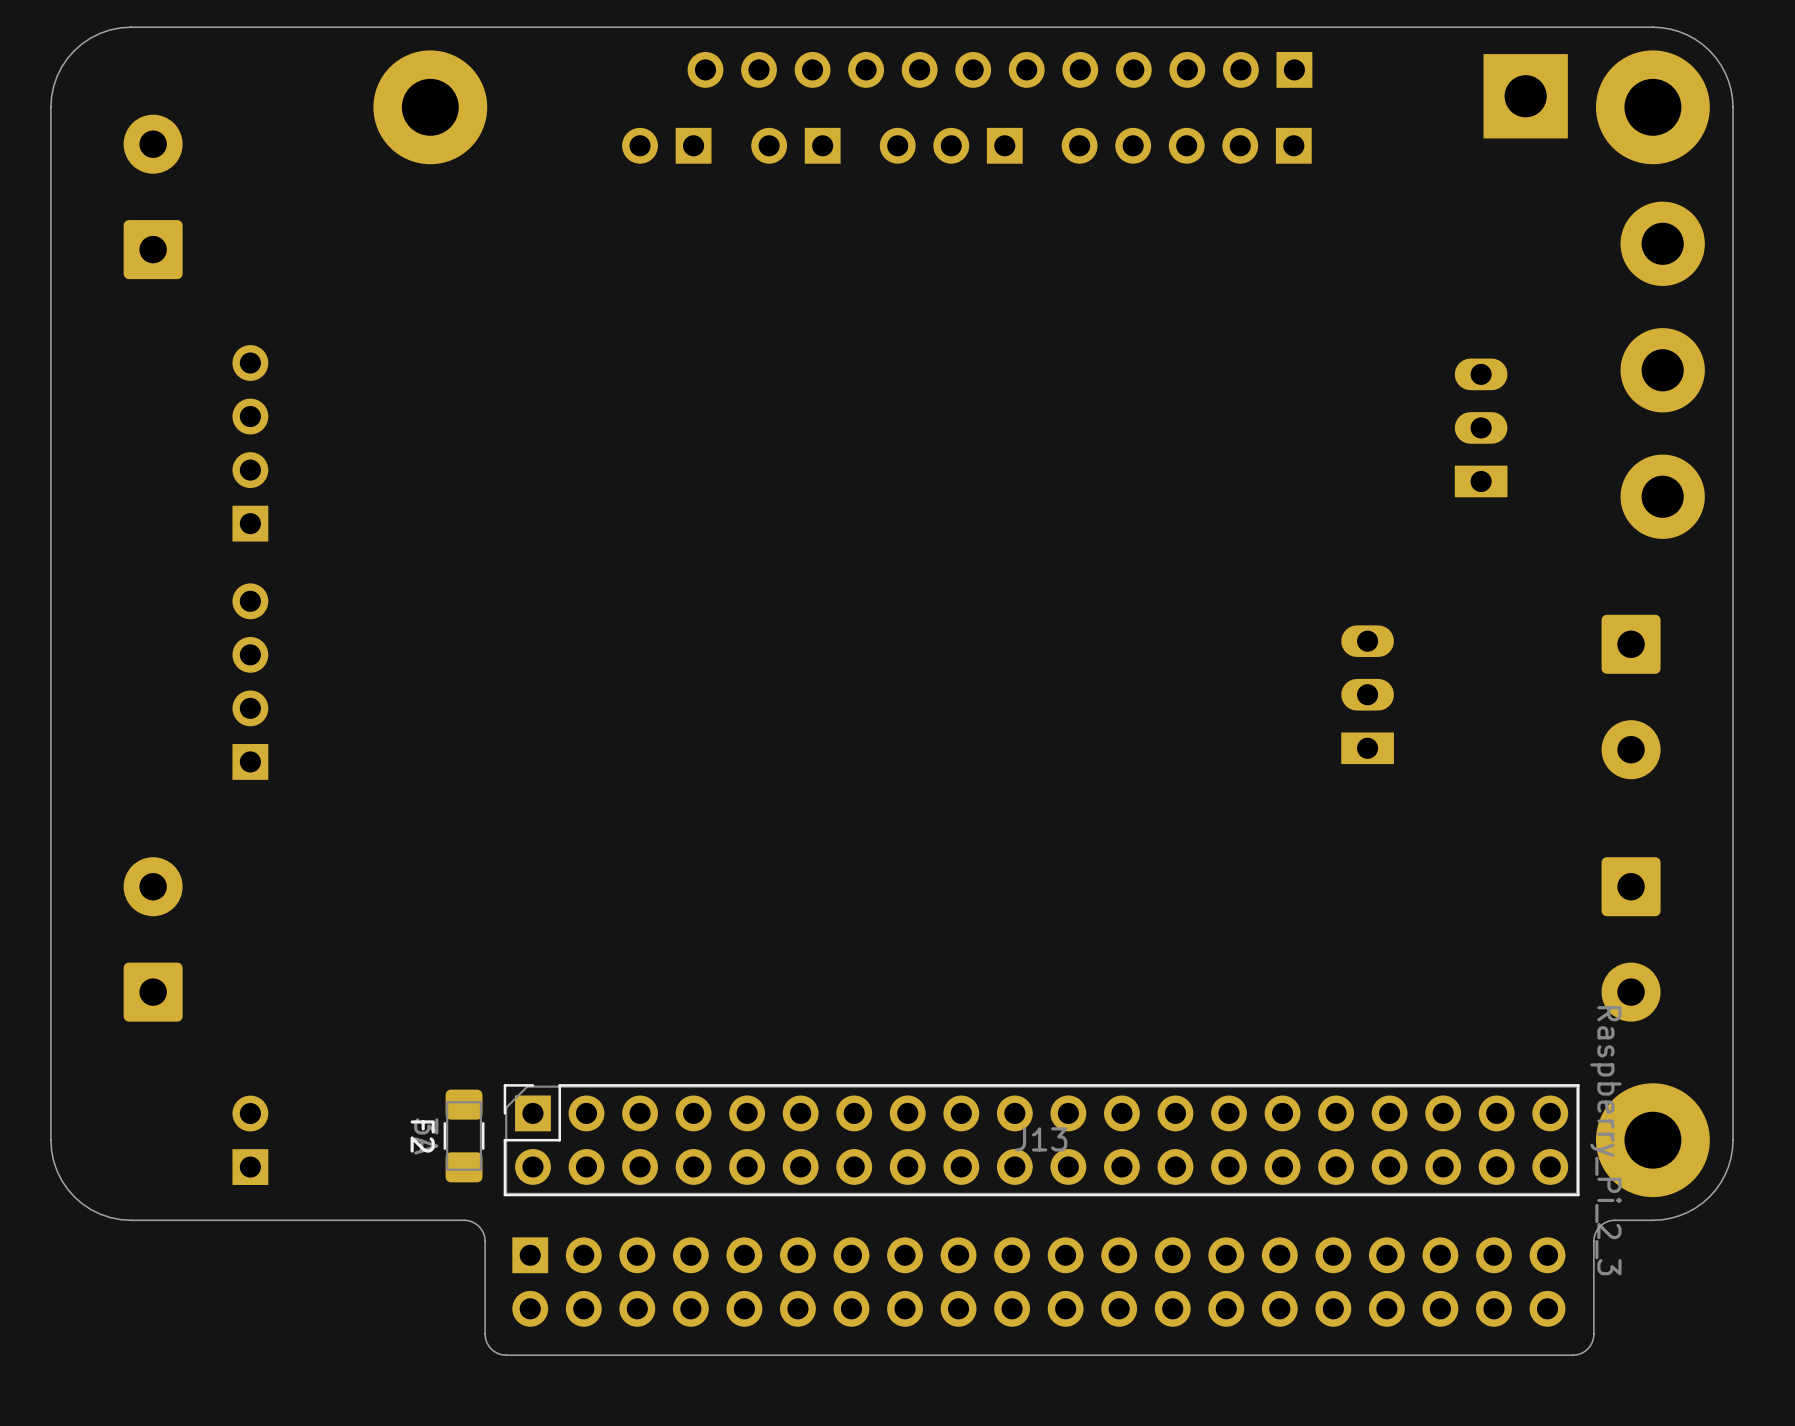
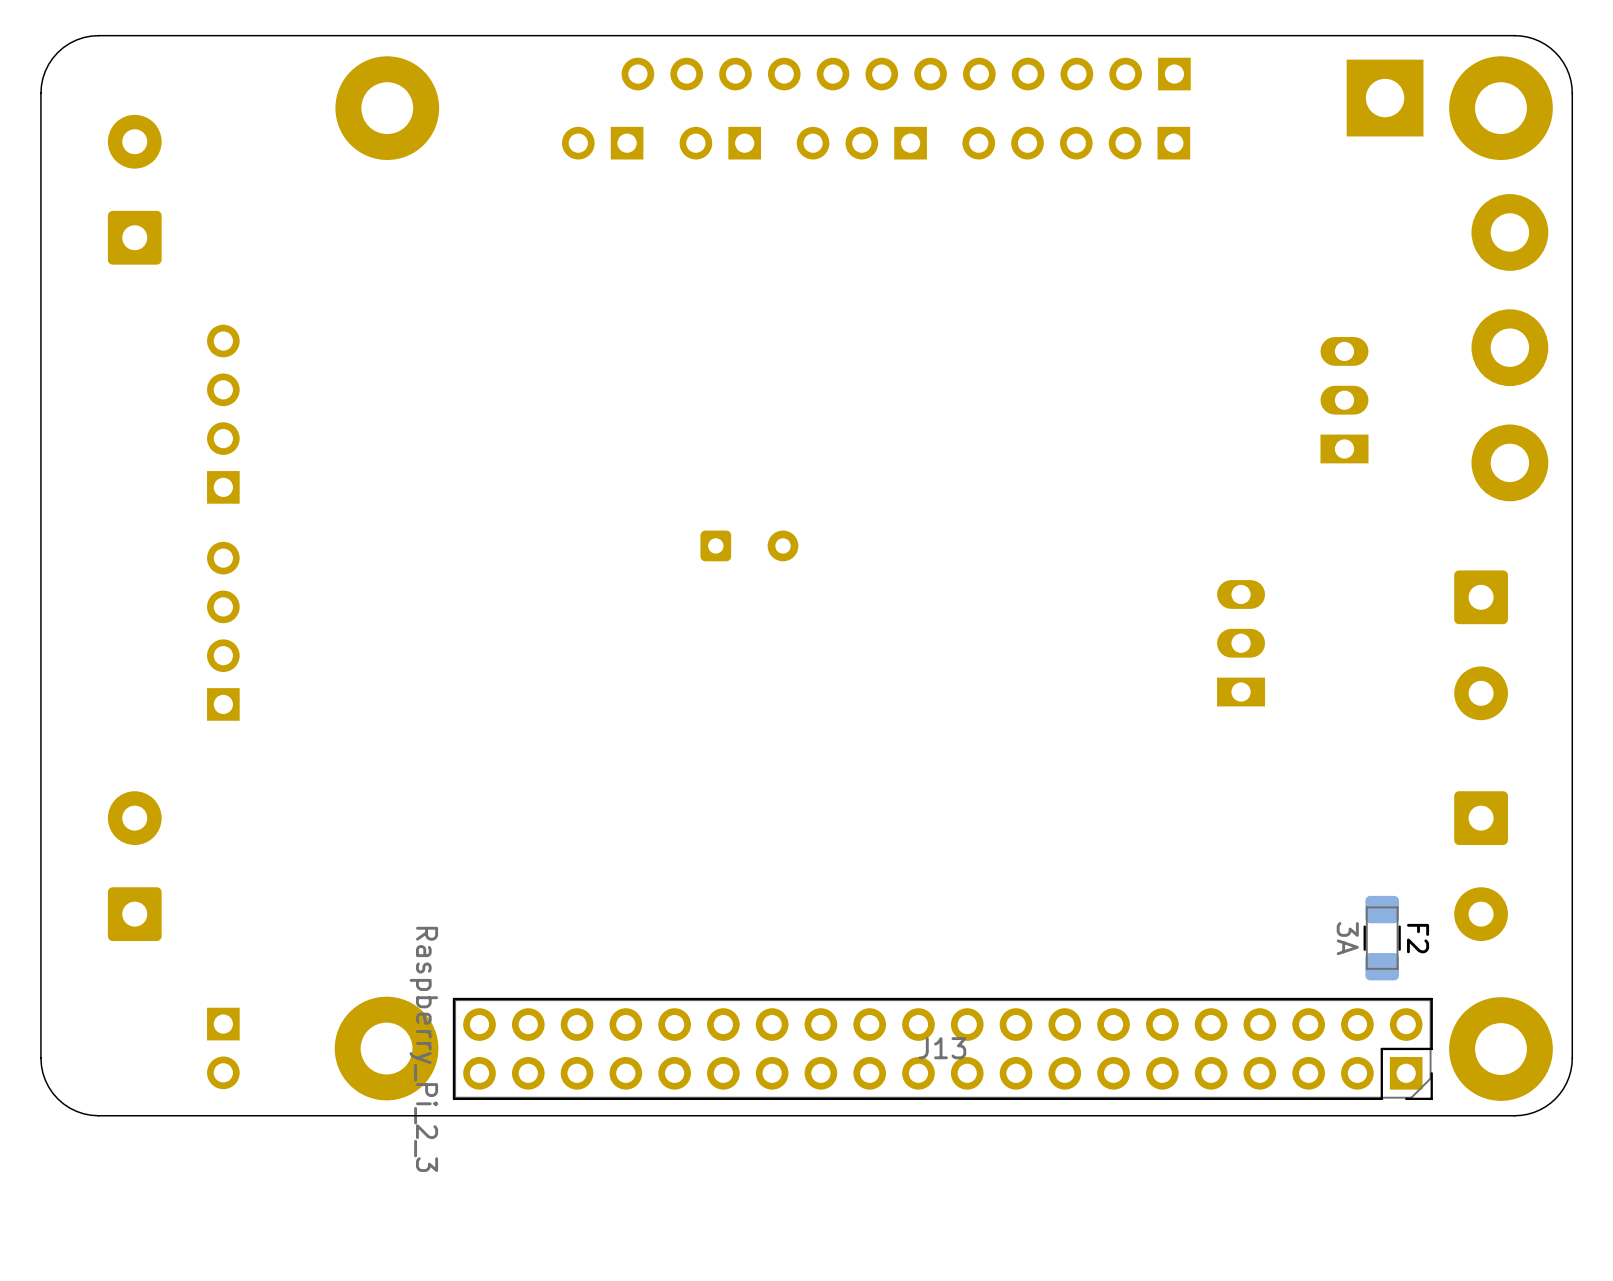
board edge: (1652, 27) (130, 27) (100, 33) (82, 43) (61, 67) (53, 86) (50, 107) (50, 1140) (56, 1170) (67, 1188) (90, 1209) (120, 1219) (471, 1221) (480, 1228) (484, 1239) (485, 1338) (491, 1349) (503, 1355) (1572, 1355) (1585, 1350) (1591, 1343) (1593, 1336) (1593, 1241) (1597, 1230) (1603, 1223) (1610, 1220) (1661, 1219) (1679, 1215) (1695, 1208) (1709, 1196) (1720, 1182) (1728, 1166) (1733, 1140) (1732, 98) (1725, 72) (1709, 50) (1687, 35) (1670, 29) (1652, 27) -> (1514, 35) (98, 35) (76, 40) (63, 47) (52, 58) (45, 71) (40, 93) (40, 1058) (45, 1080) (52, 1093) (69, 1108) (83, 1113) (98, 1115) (1514, 1115) (1533, 1112) (1550, 1103) (1566, 1083) (1572, 1058) (1572, 93) (1566, 68) (1555, 52) (1539, 41) (1514, 35)
part: none -> (749, 545)
F2 position: (464, 1135) -> (1382, 938)
F2 name position: F2 (422, 1136) -> F2 (1418, 938)
part: none -> (386, 1048)
part rotation: 0° (250, 1140) -> 180° (223, 1048)
J13 rotation: 0° (1041, 1140) -> 180° (942, 1048)
part: (1038, 1282) -> none

